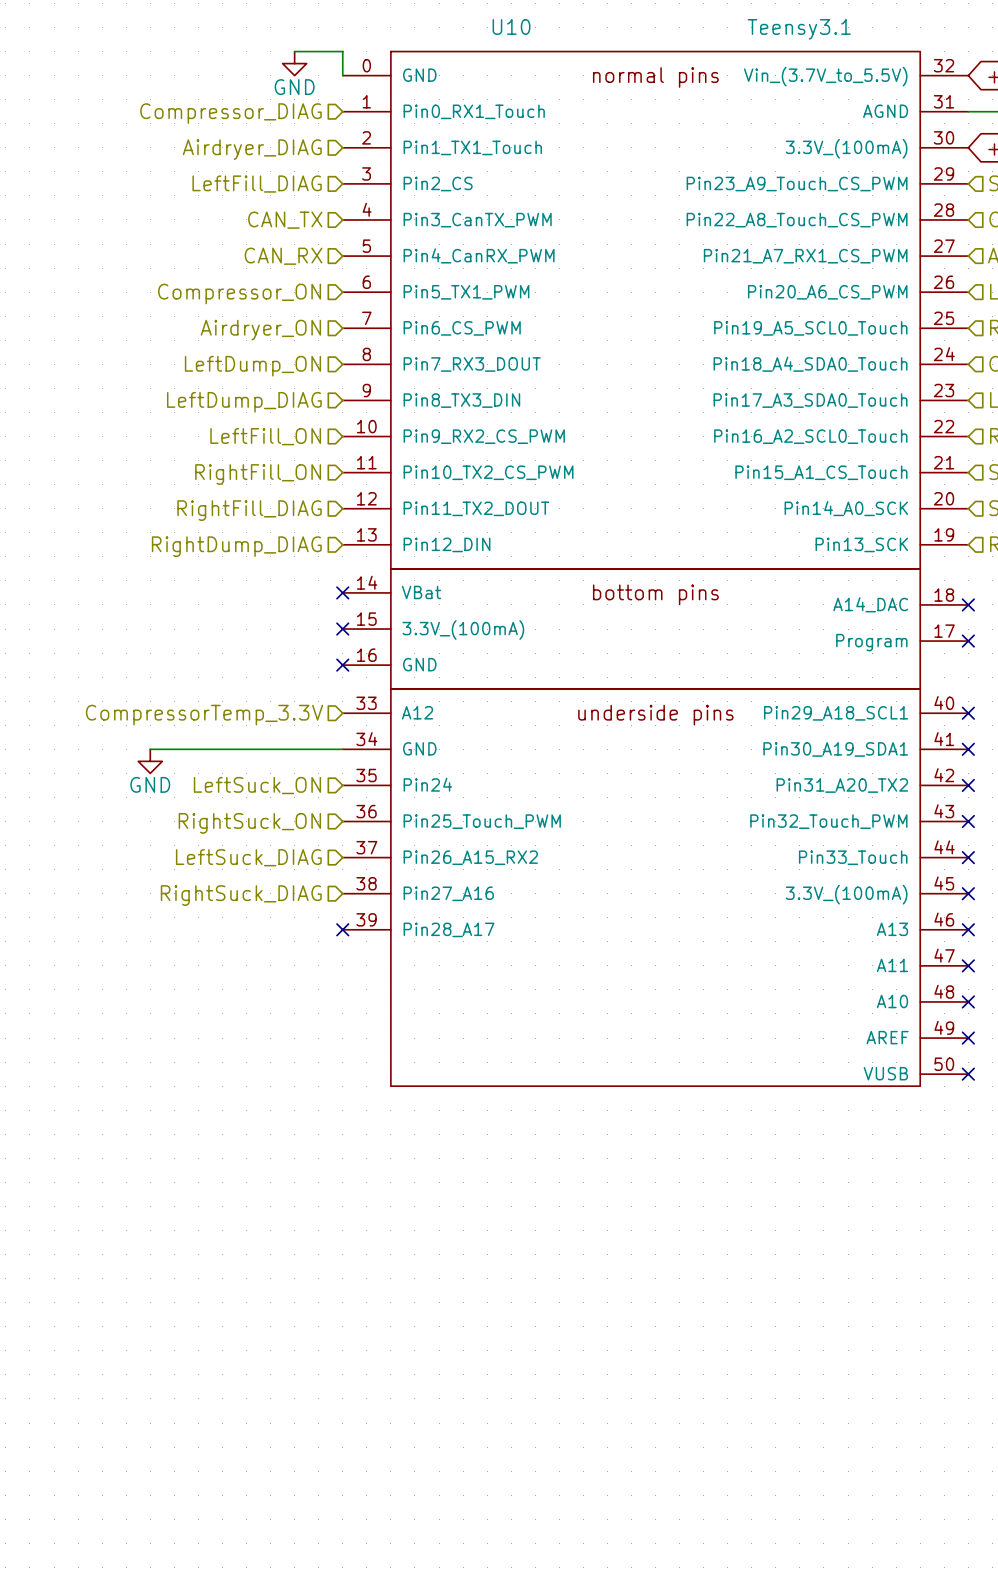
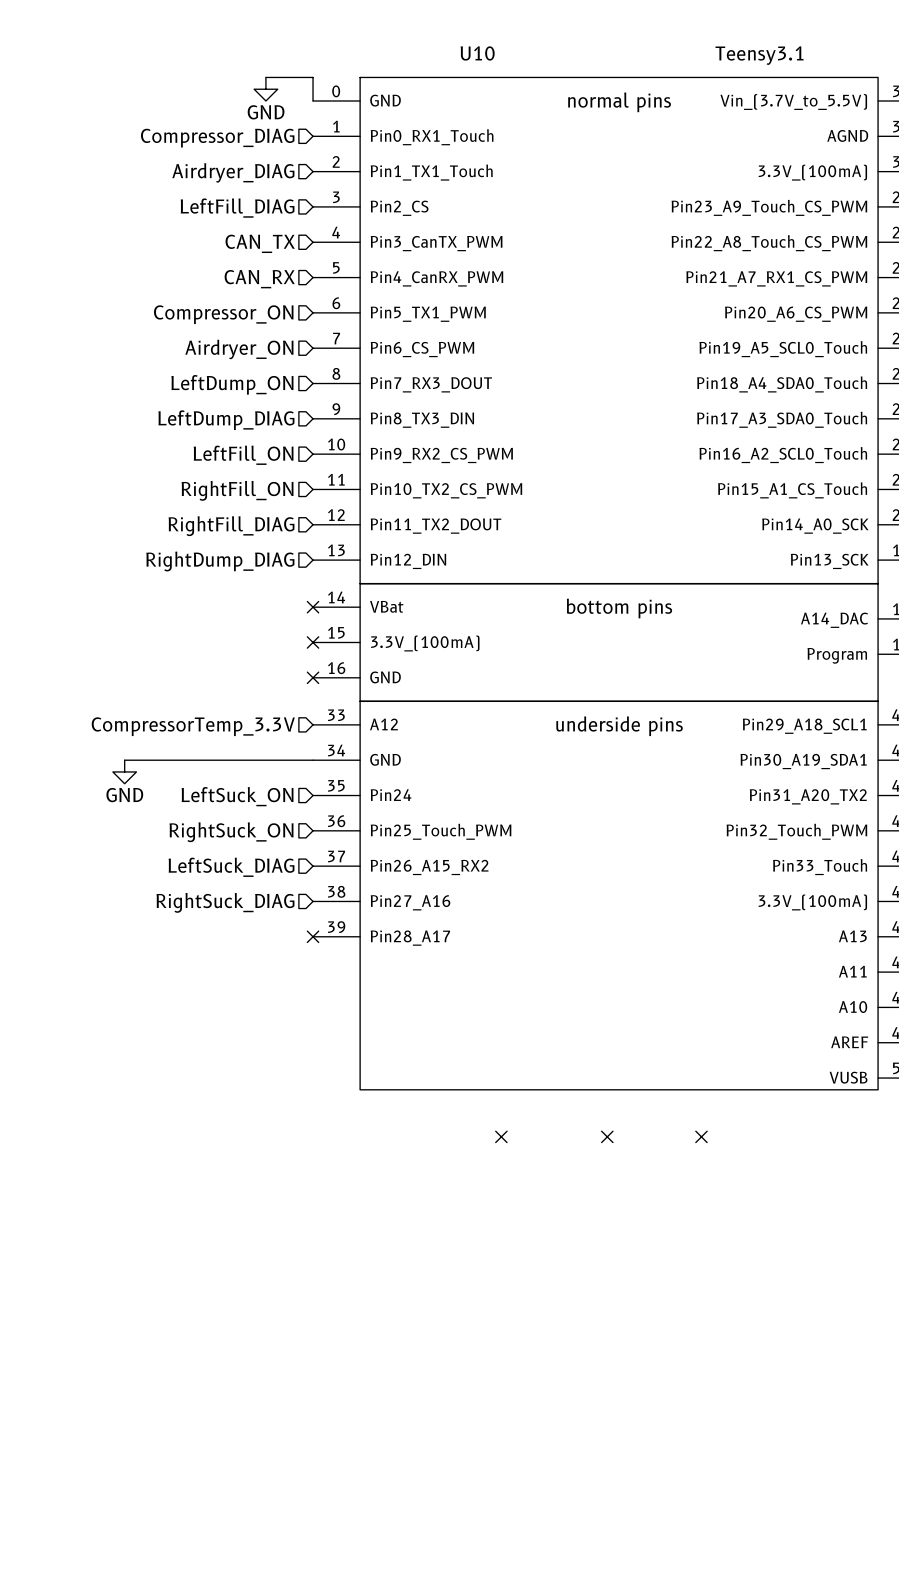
no-connect mark: none -> (501, 1136)
no-connect mark: none -> (607, 1136)
no-connect mark: none -> (701, 1136)

